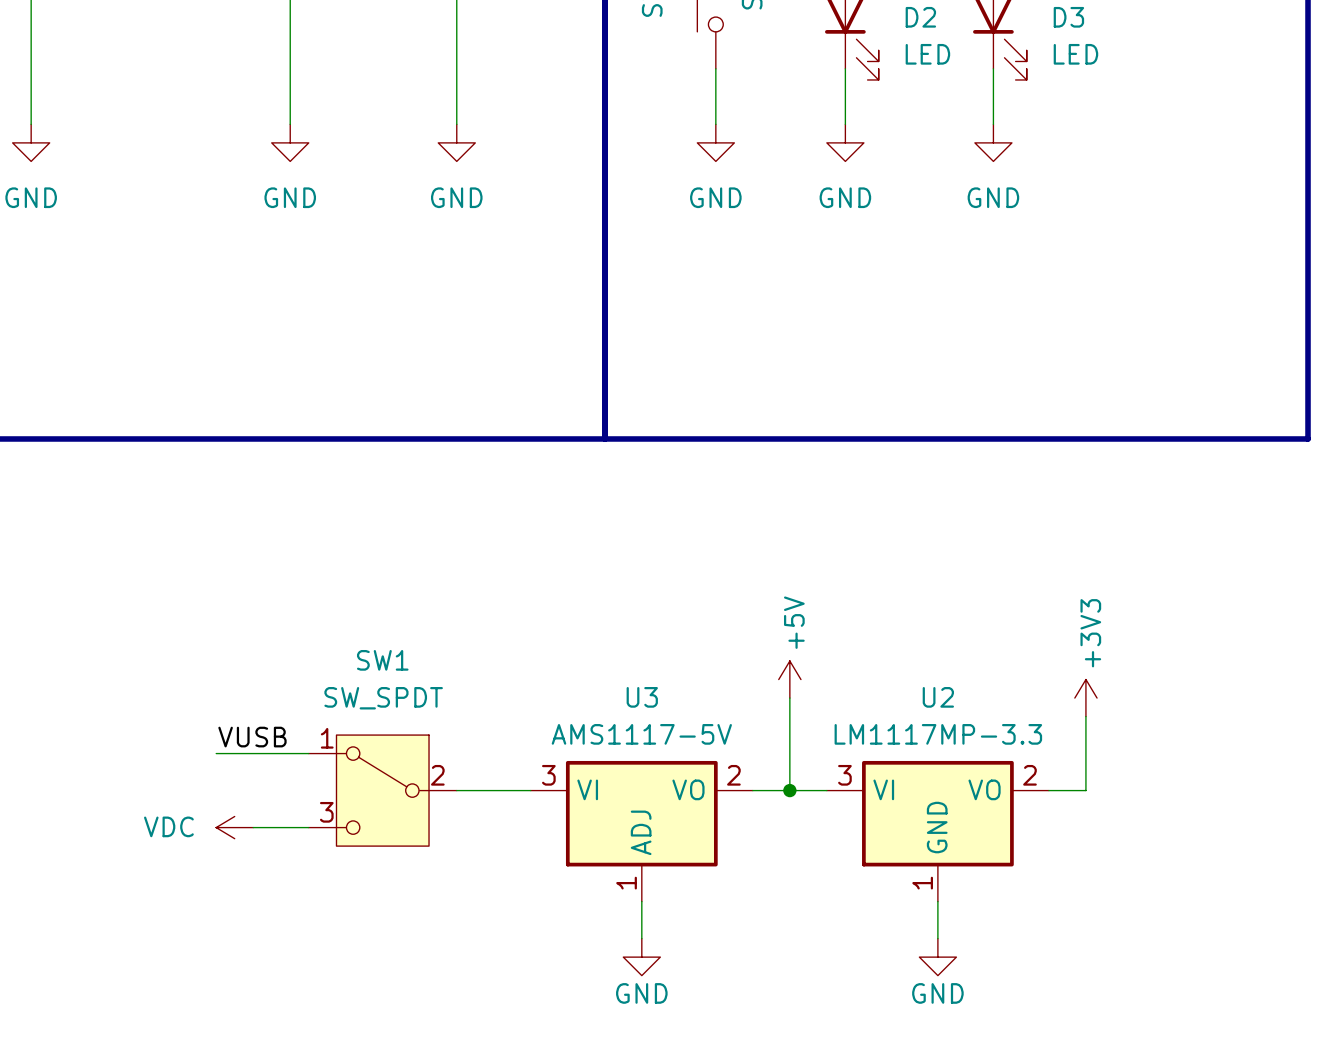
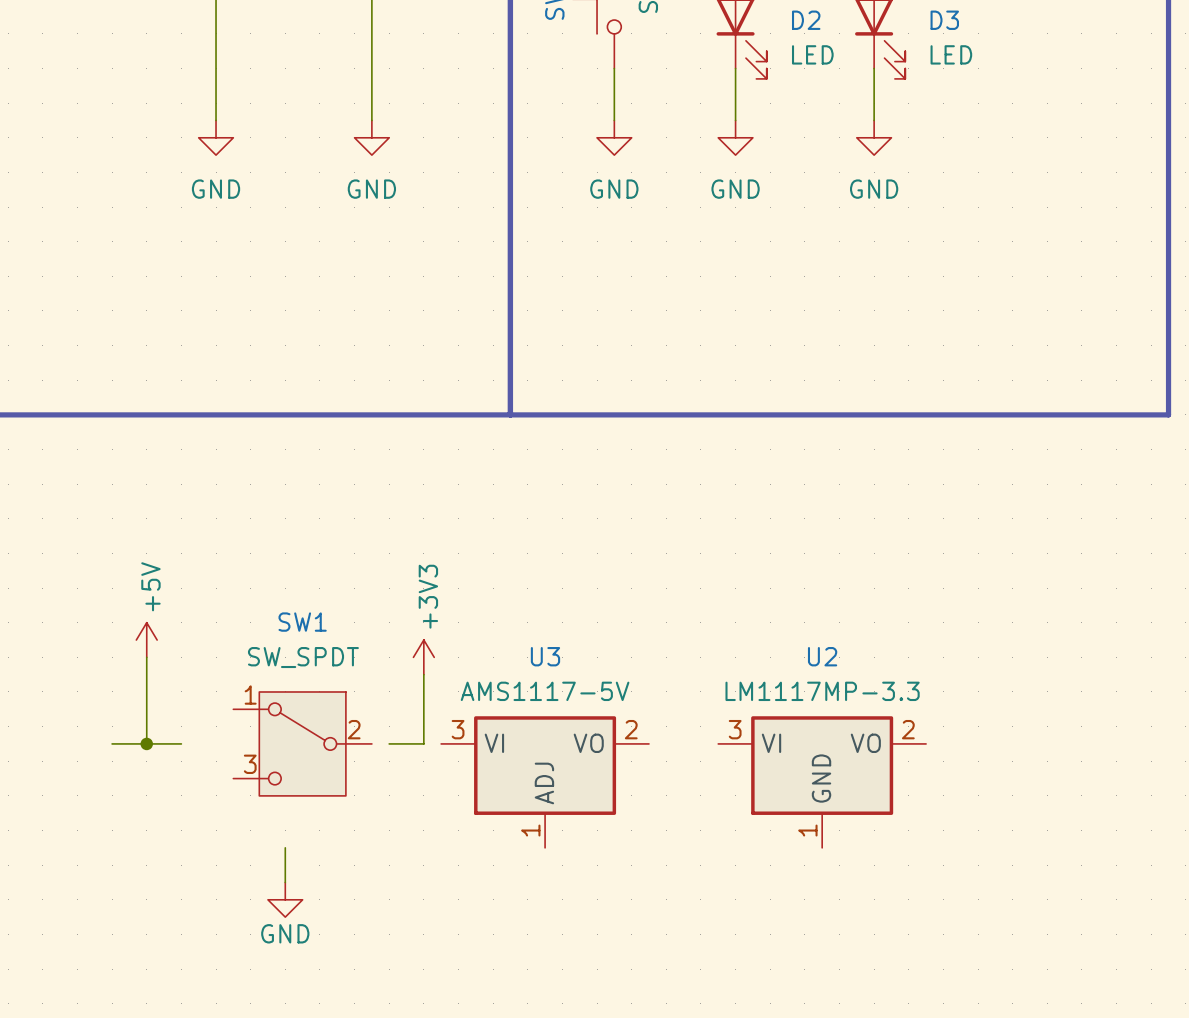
power symbol: none -> +5V (146, 640)
power symbol: +5V (789, 679) -> none
wire: none -> (146, 657) (146, 743)
power symbol: none -> +3V3 (423, 657)
wire: (789, 698) (789, 790) -> none
power symbol: +3V3 (1085, 698) -> none
wire: (1085, 716) (1085, 790) (1048, 790) -> none
label: VUSB (252, 737) -> none
wire: (216, 753) (308, 753) -> none
wire: none -> (112, 743) (181, 743)
junction: none -> (146, 743)
wire: (456, 790) (475, 790) -> none
wire: (512, 790) (530, 790) -> (423, 743) (423, 674)
wire: (752, 790) (826, 790) -> none
junction: (789, 790) -> none
power symbol: VDC (234, 827) -> none
wire: (253, 827) (308, 827) -> none
wire: (641, 901) (641, 938) -> (285, 847) (285, 882)
wire: (937, 901) (937, 938) -> none
power symbol position: GND (641, 957) -> GND (285, 899)
power symbol: GND (937, 957) -> none

